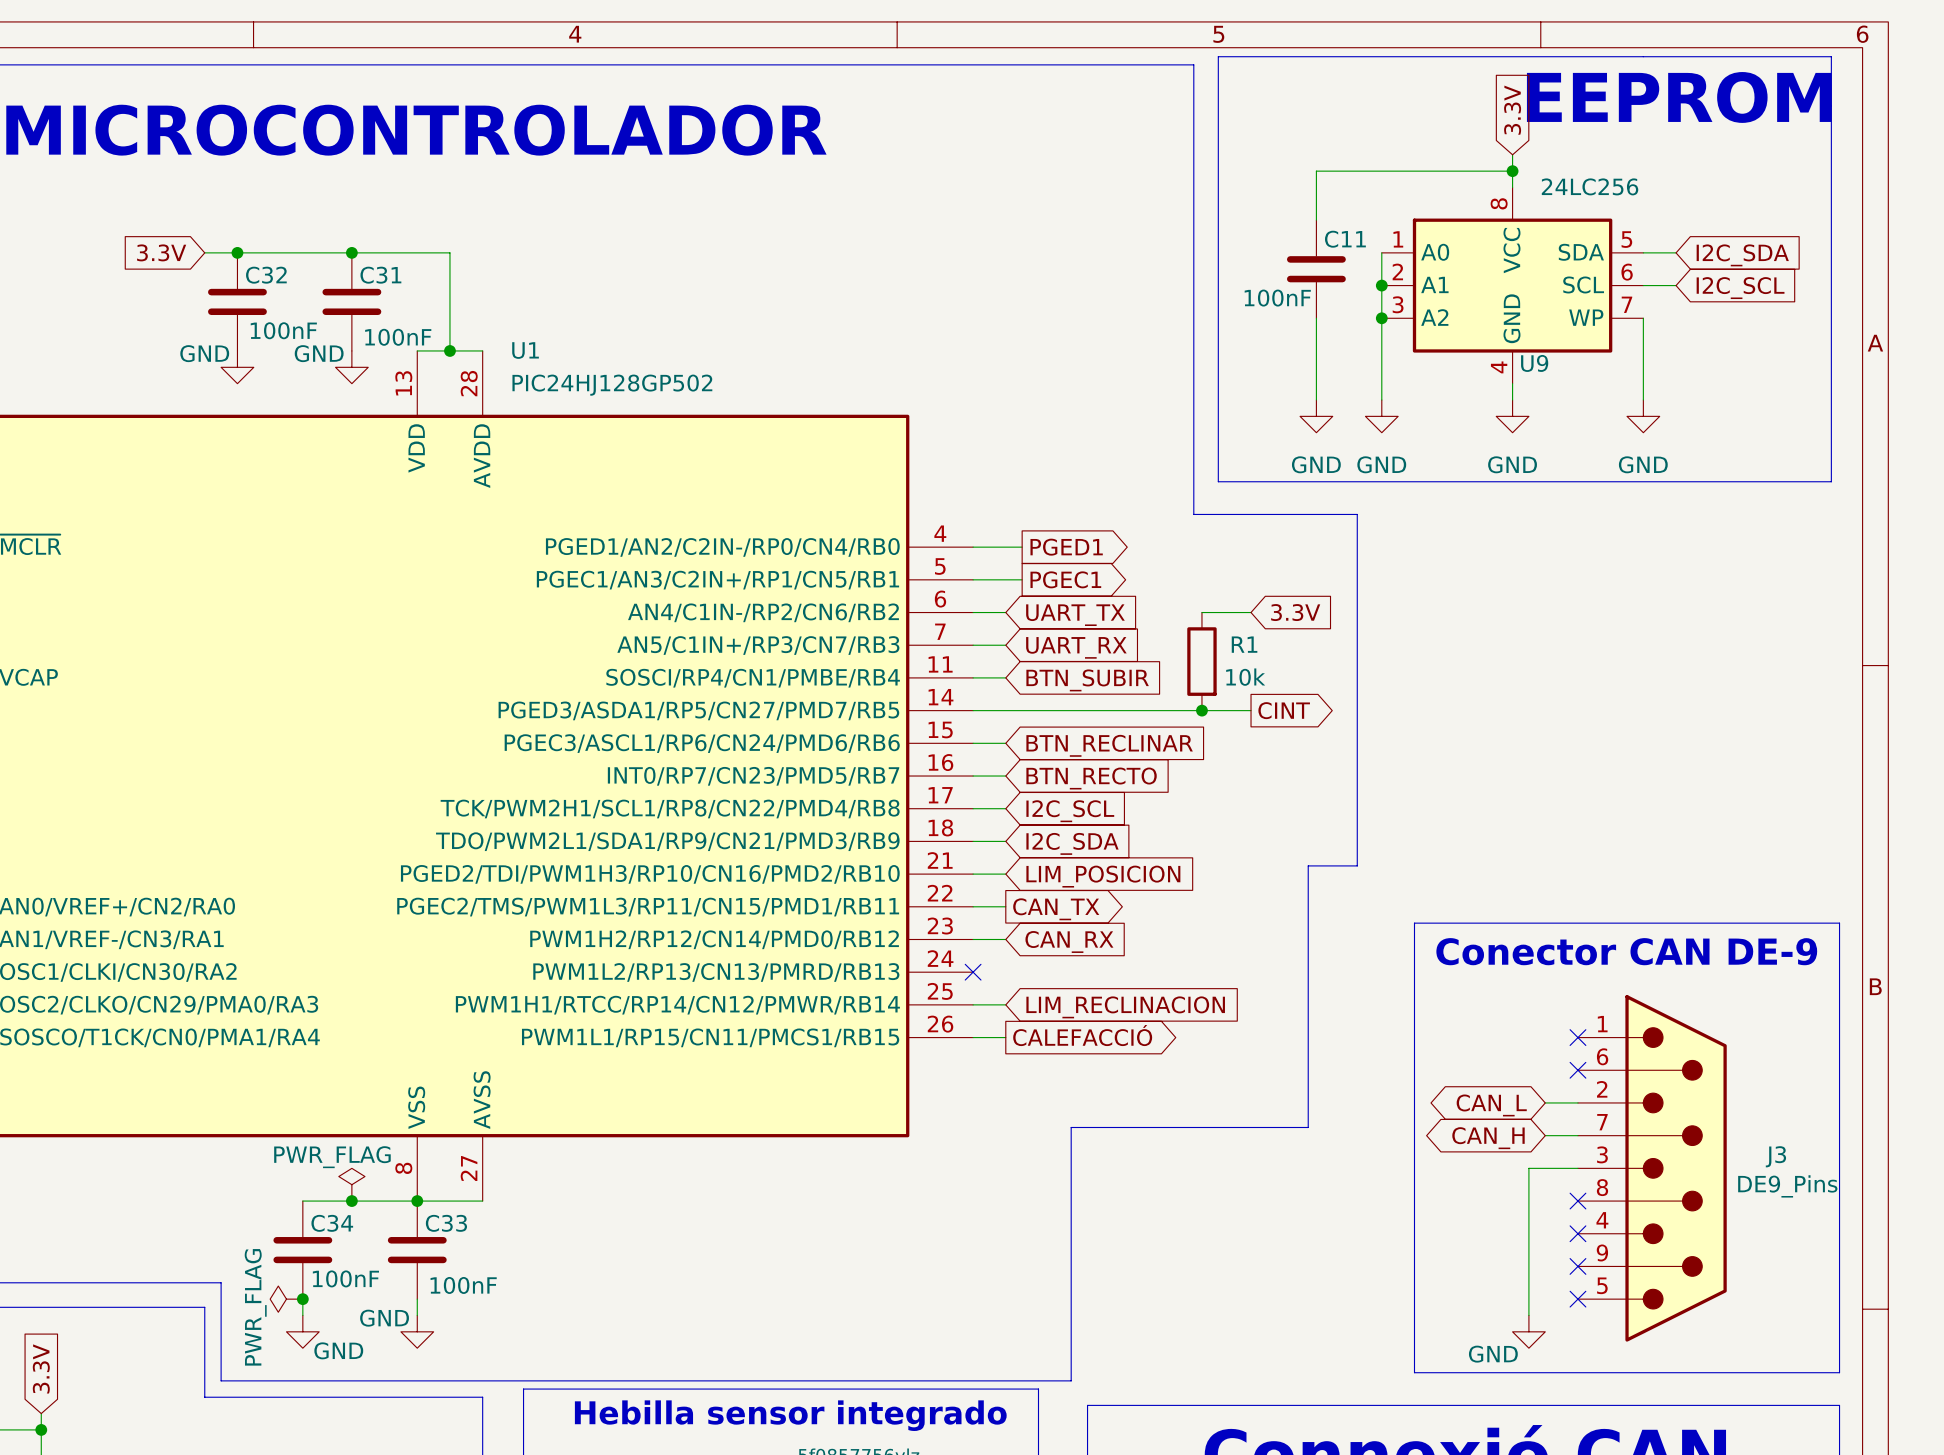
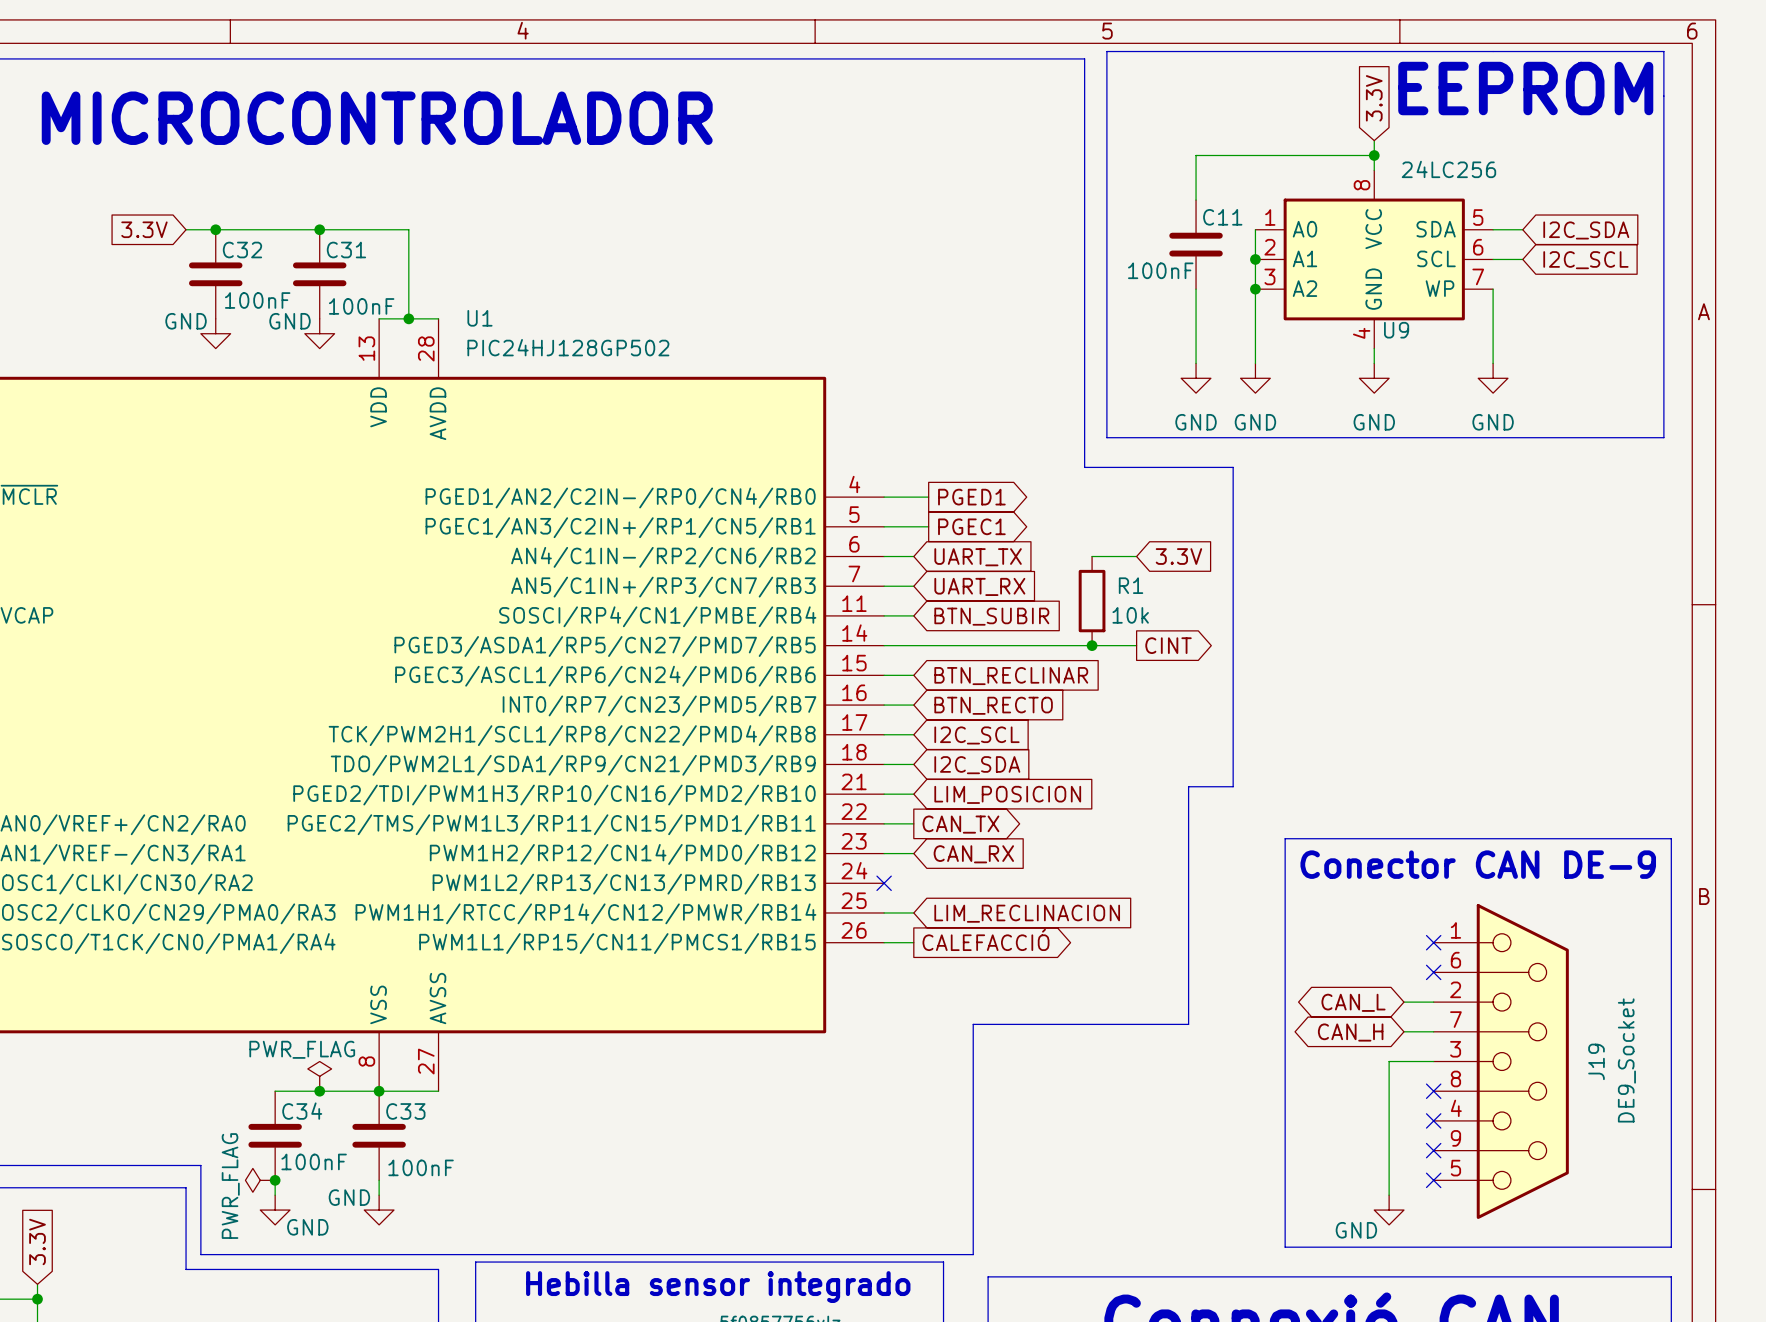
J3: DE9_Pins (1652, 1168) -> none
J19: none -> DE9_Socket (1501, 1061)

